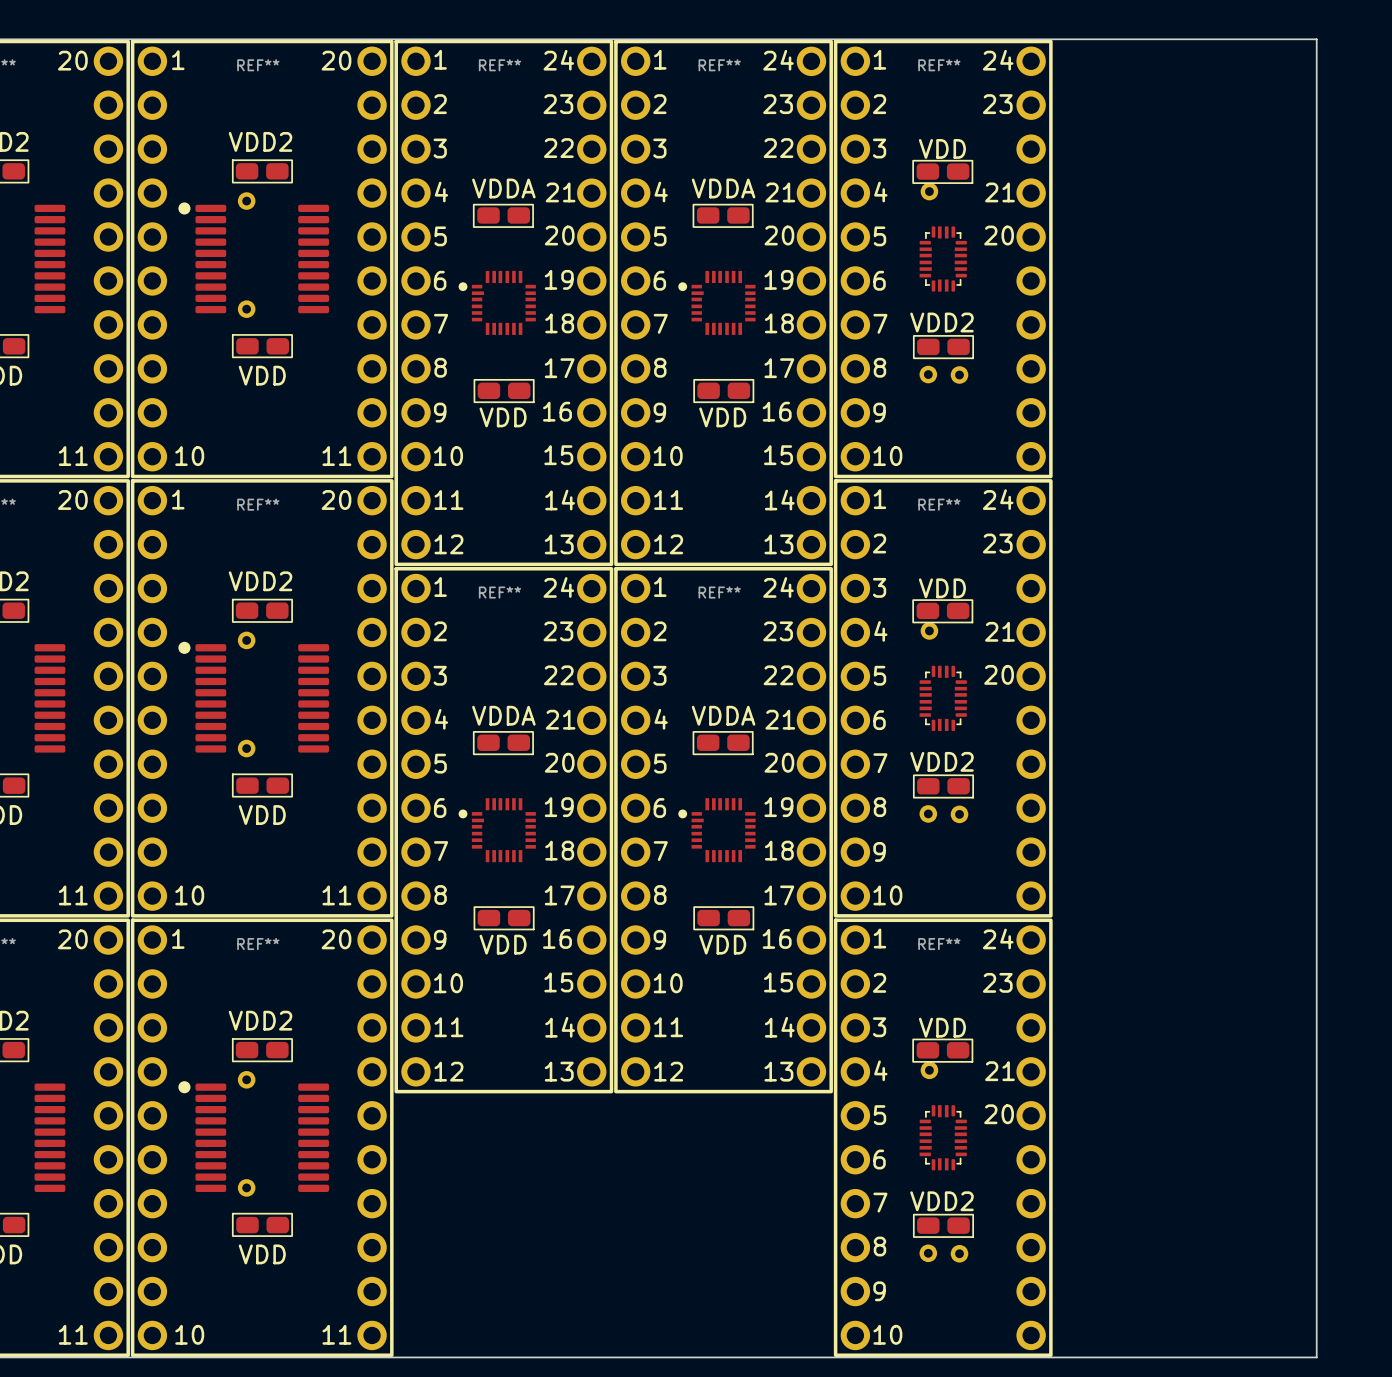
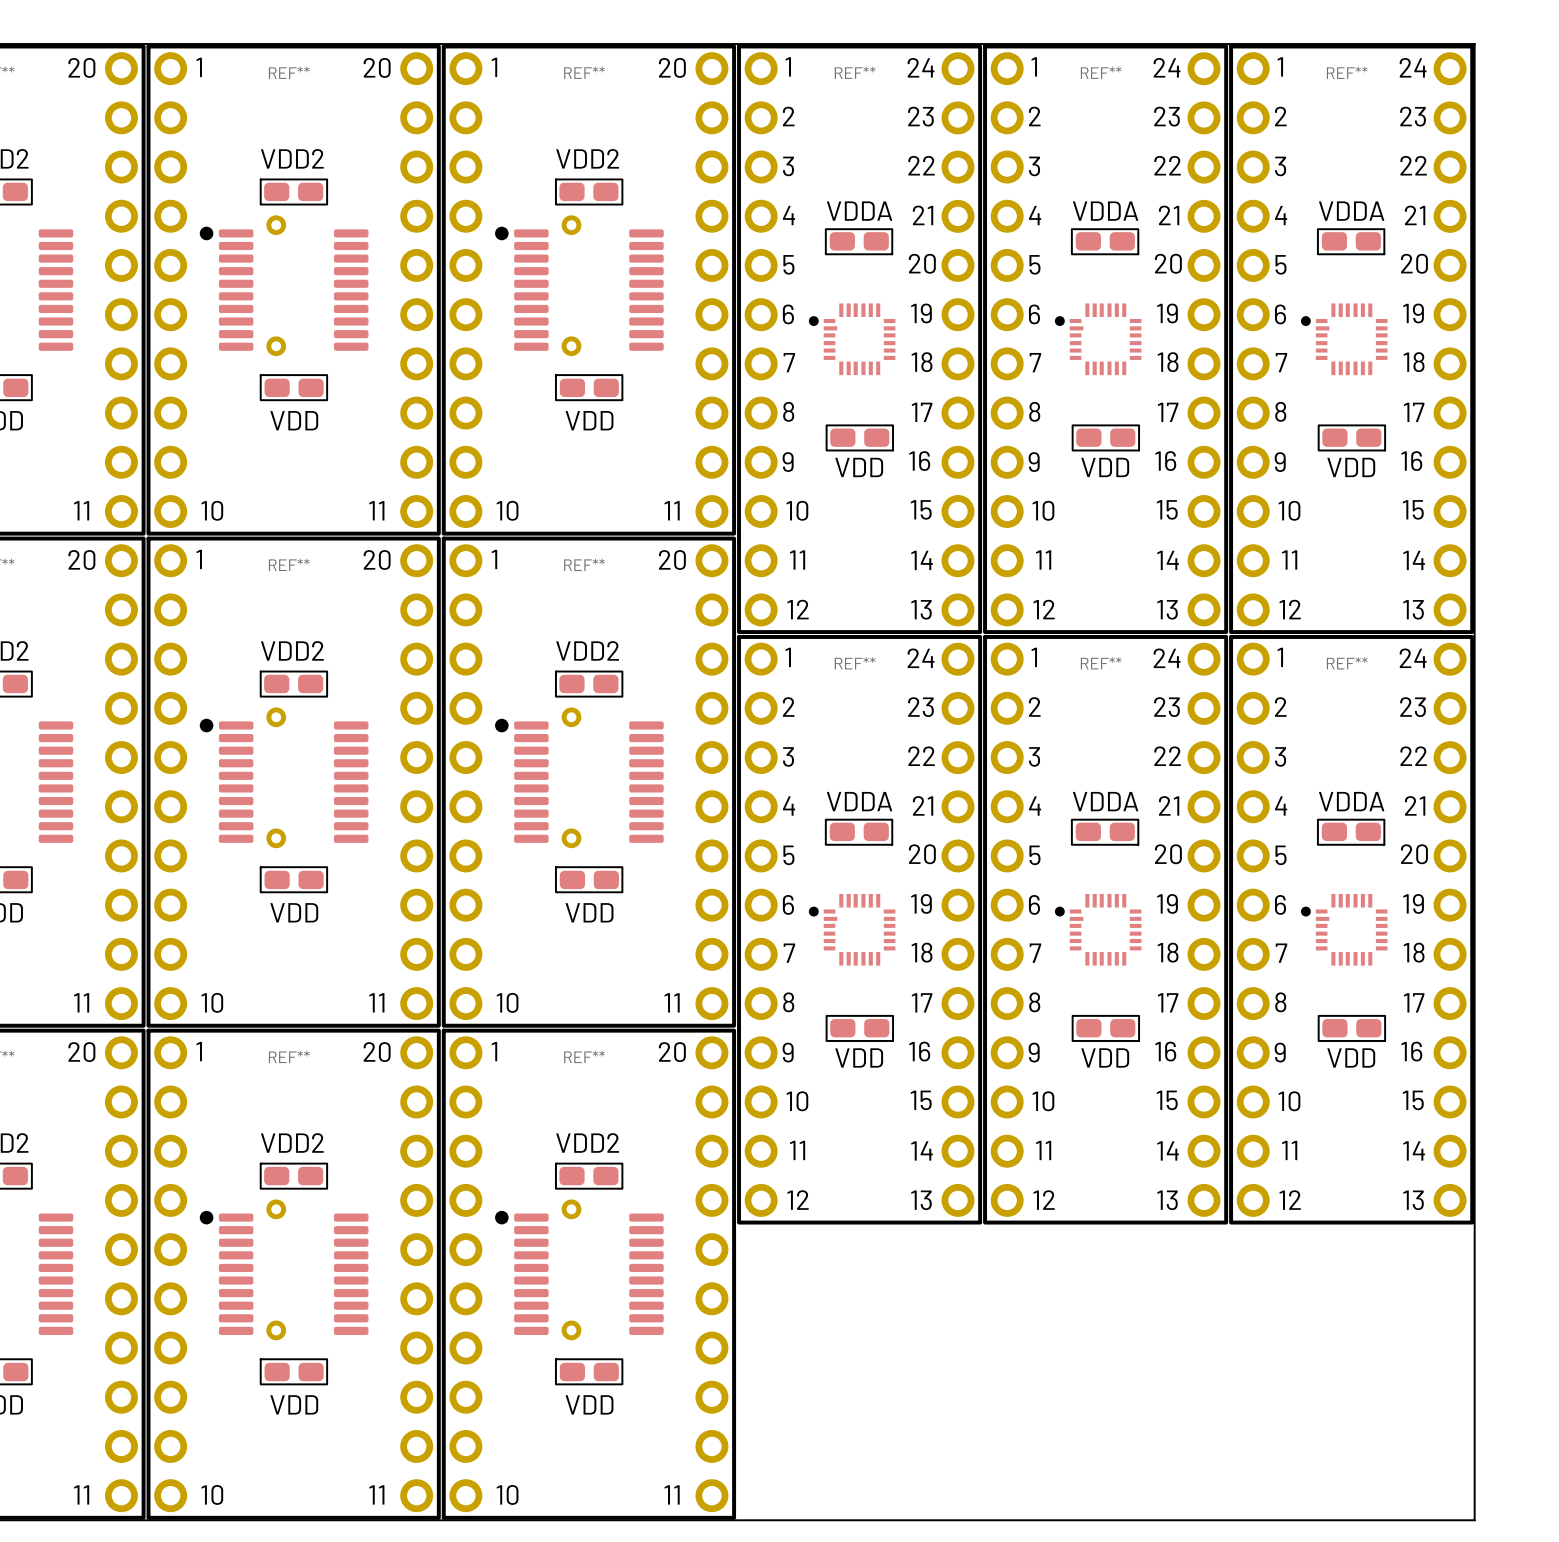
REF**: none -> (588, 290)
REF**: (943, 259) -> none
REF**: (503, 302) -> none
REF** position: (723, 302) -> (859, 339)
REF**: none -> (1105, 339)
REF**: none -> (1351, 339)
REF**: none -> (588, 782)
REF**: (943, 698) -> none
REF**: (503, 830) -> none
REF** position: (723, 830) -> (859, 929)
REF**: none -> (1105, 929)
REF**: none -> (1351, 929)
REF**: none -> (588, 1274)
REF**: (943, 1137) -> none

